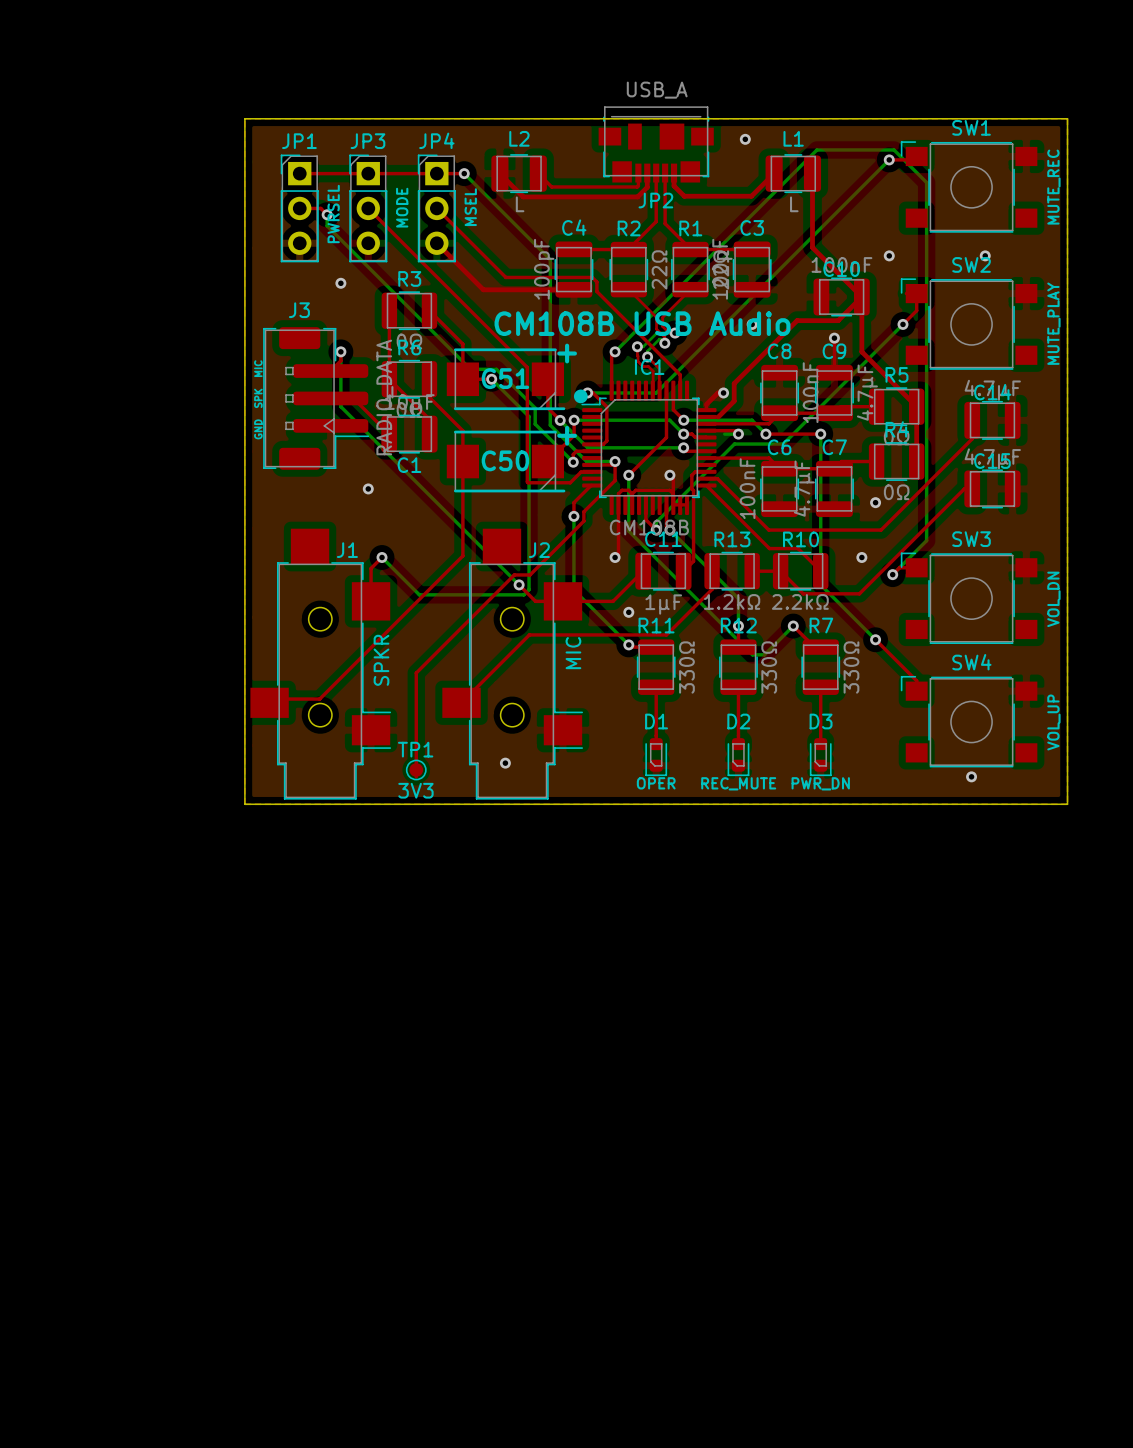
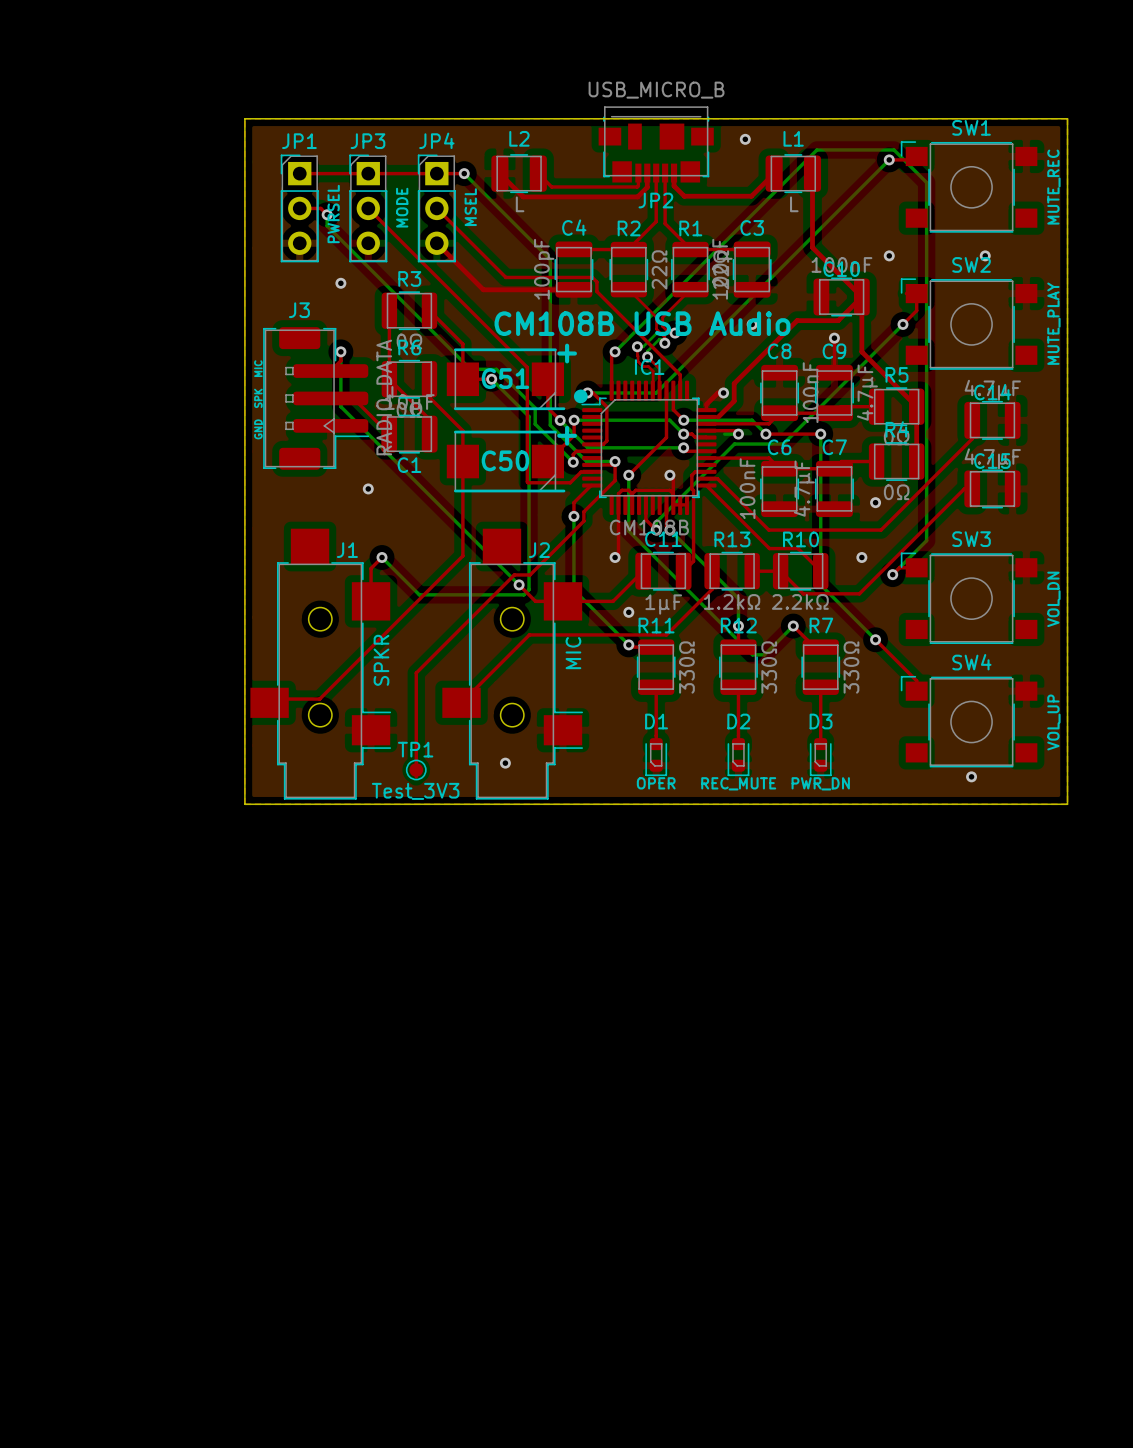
JP2 value: USB_A (657, 90) -> USB_MICRO_B (656, 90)
TP1 value: 3V3 (415, 790) -> Test_3V3 (415, 791)

